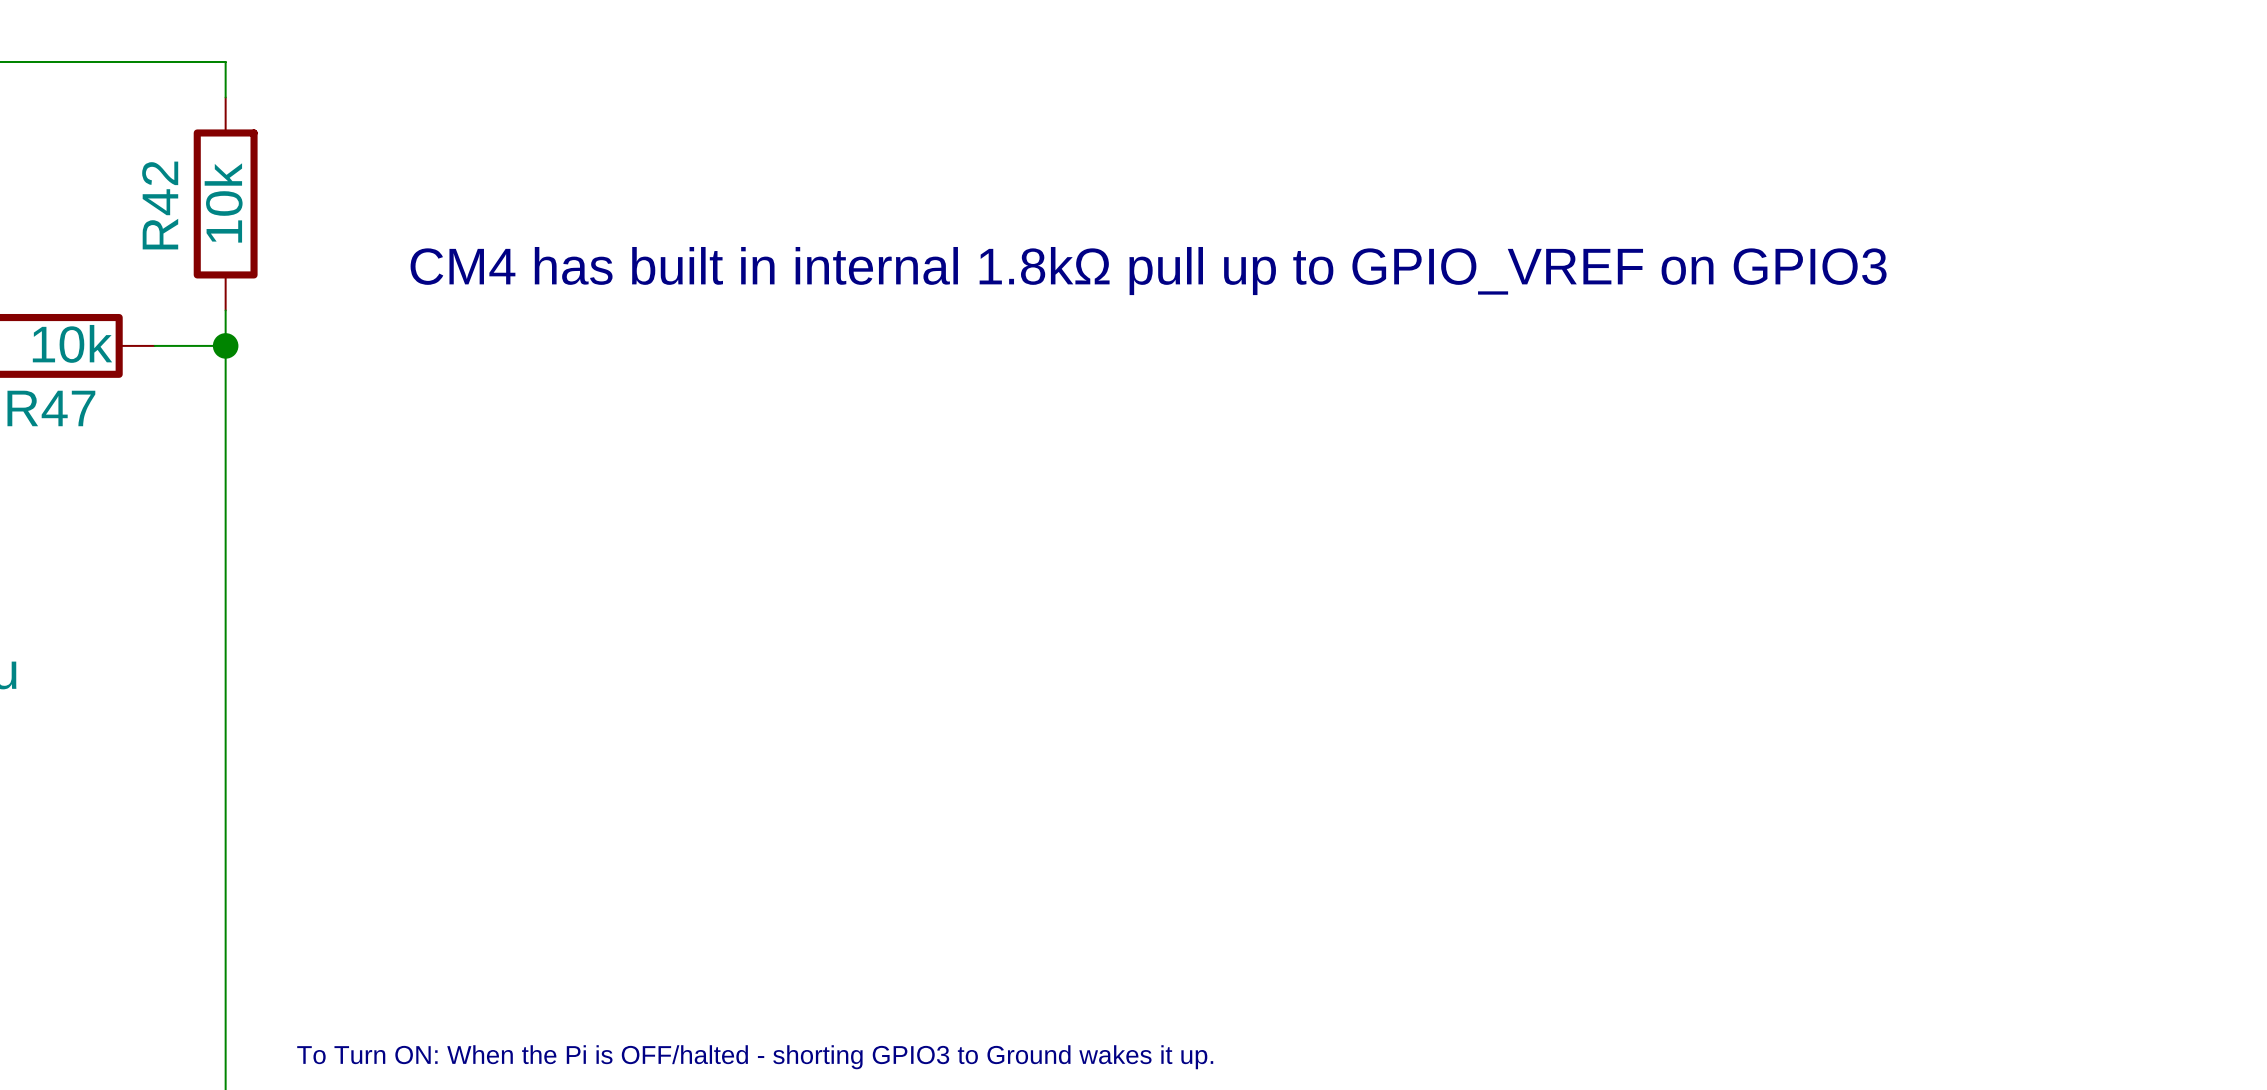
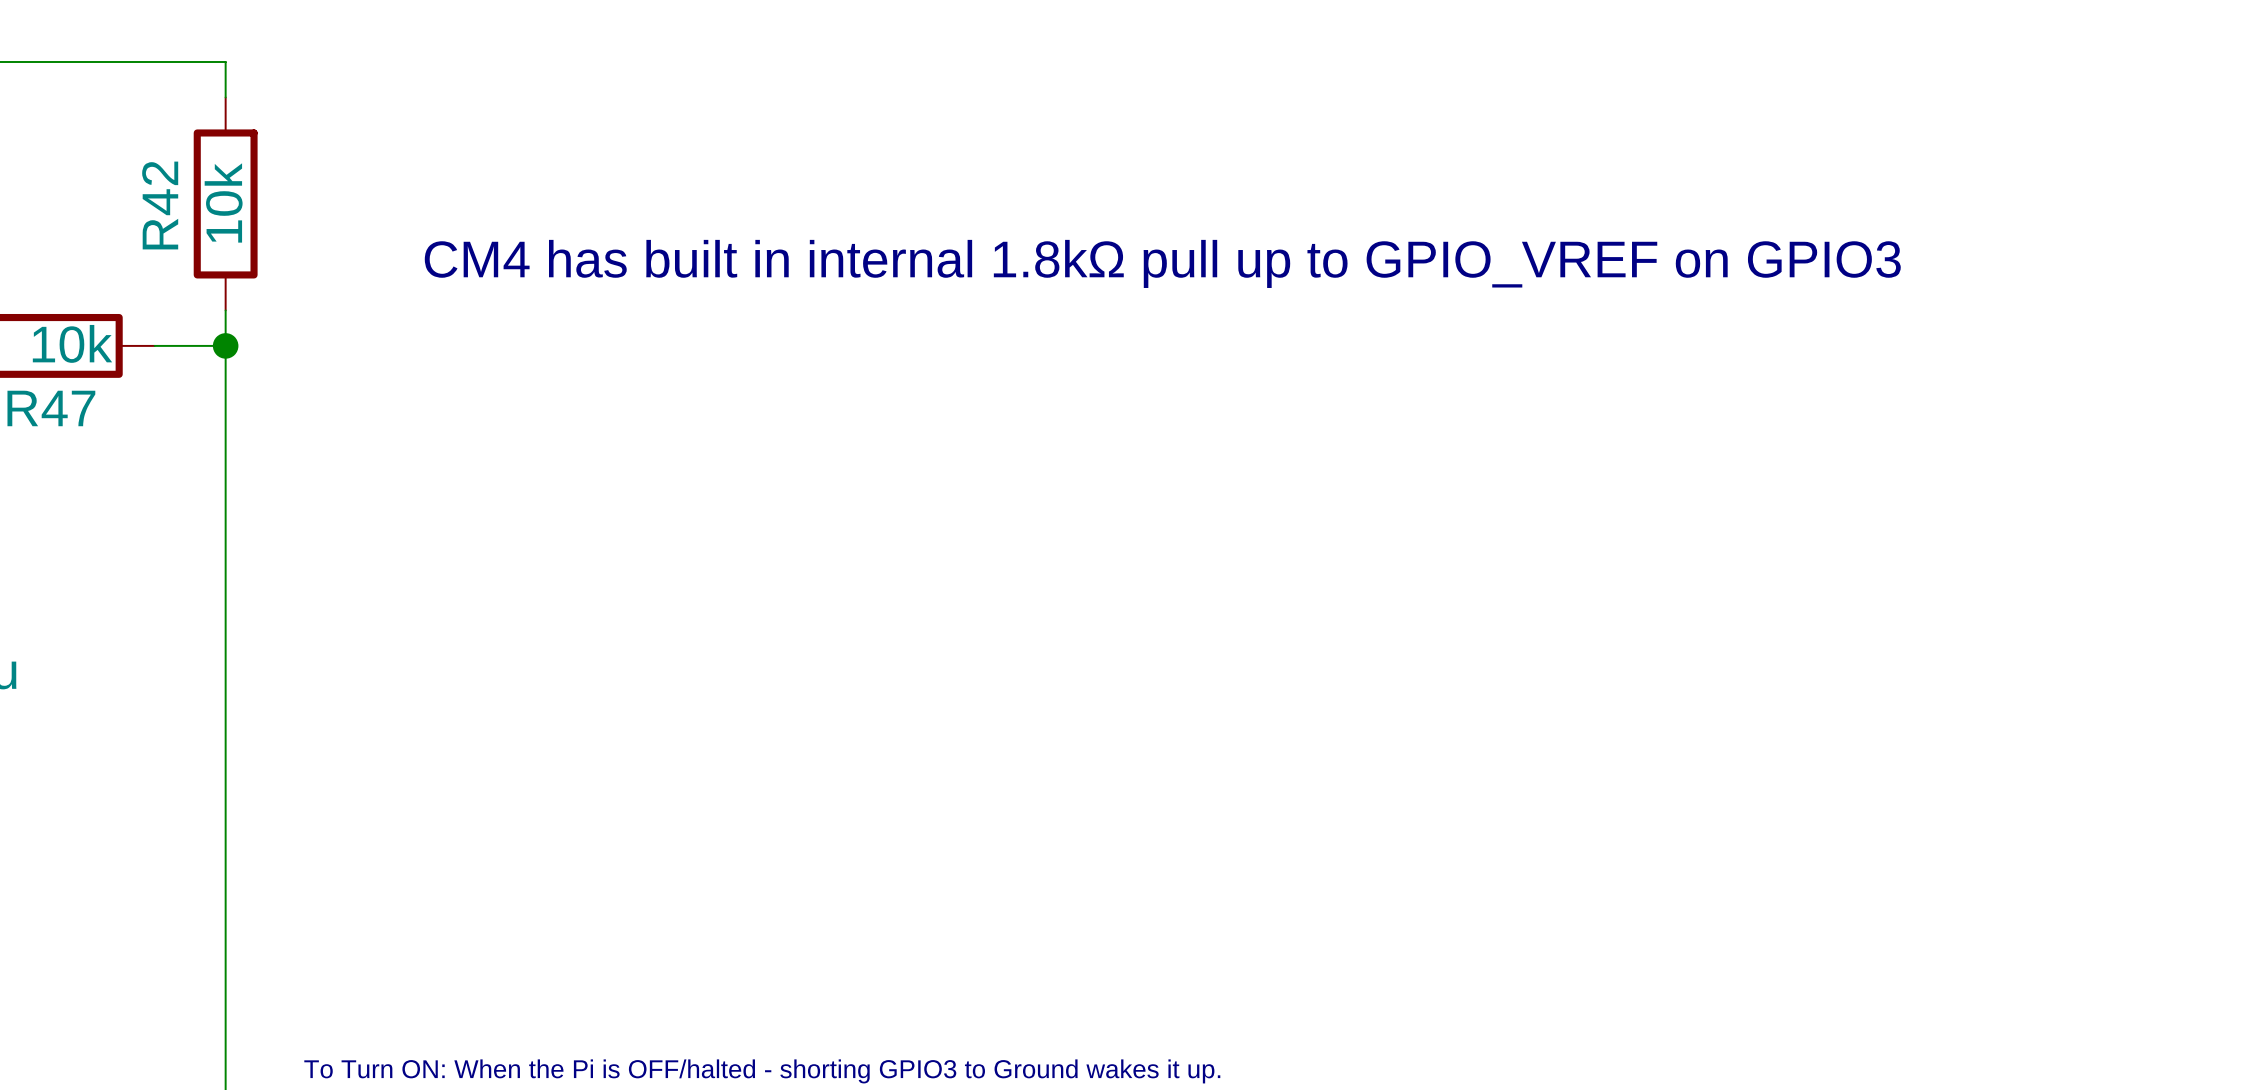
text position: CM4 has built in internal 1.8kΩ pull up to GPIO_VREF on GPIO3 (1148, 271) -> CM4 has built in internal 1.8kΩ pull up to GPIO_VREF on GPIO3 (1162, 263)
text position: To Turn ON: When the Pi is OFF/halted - shorting GPIO3 to Ground wakes it up. (755, 1057) -> To Turn ON: When the Pi is OFF/halted - shorting GPIO3 to Ground wakes it up. (762, 1071)

